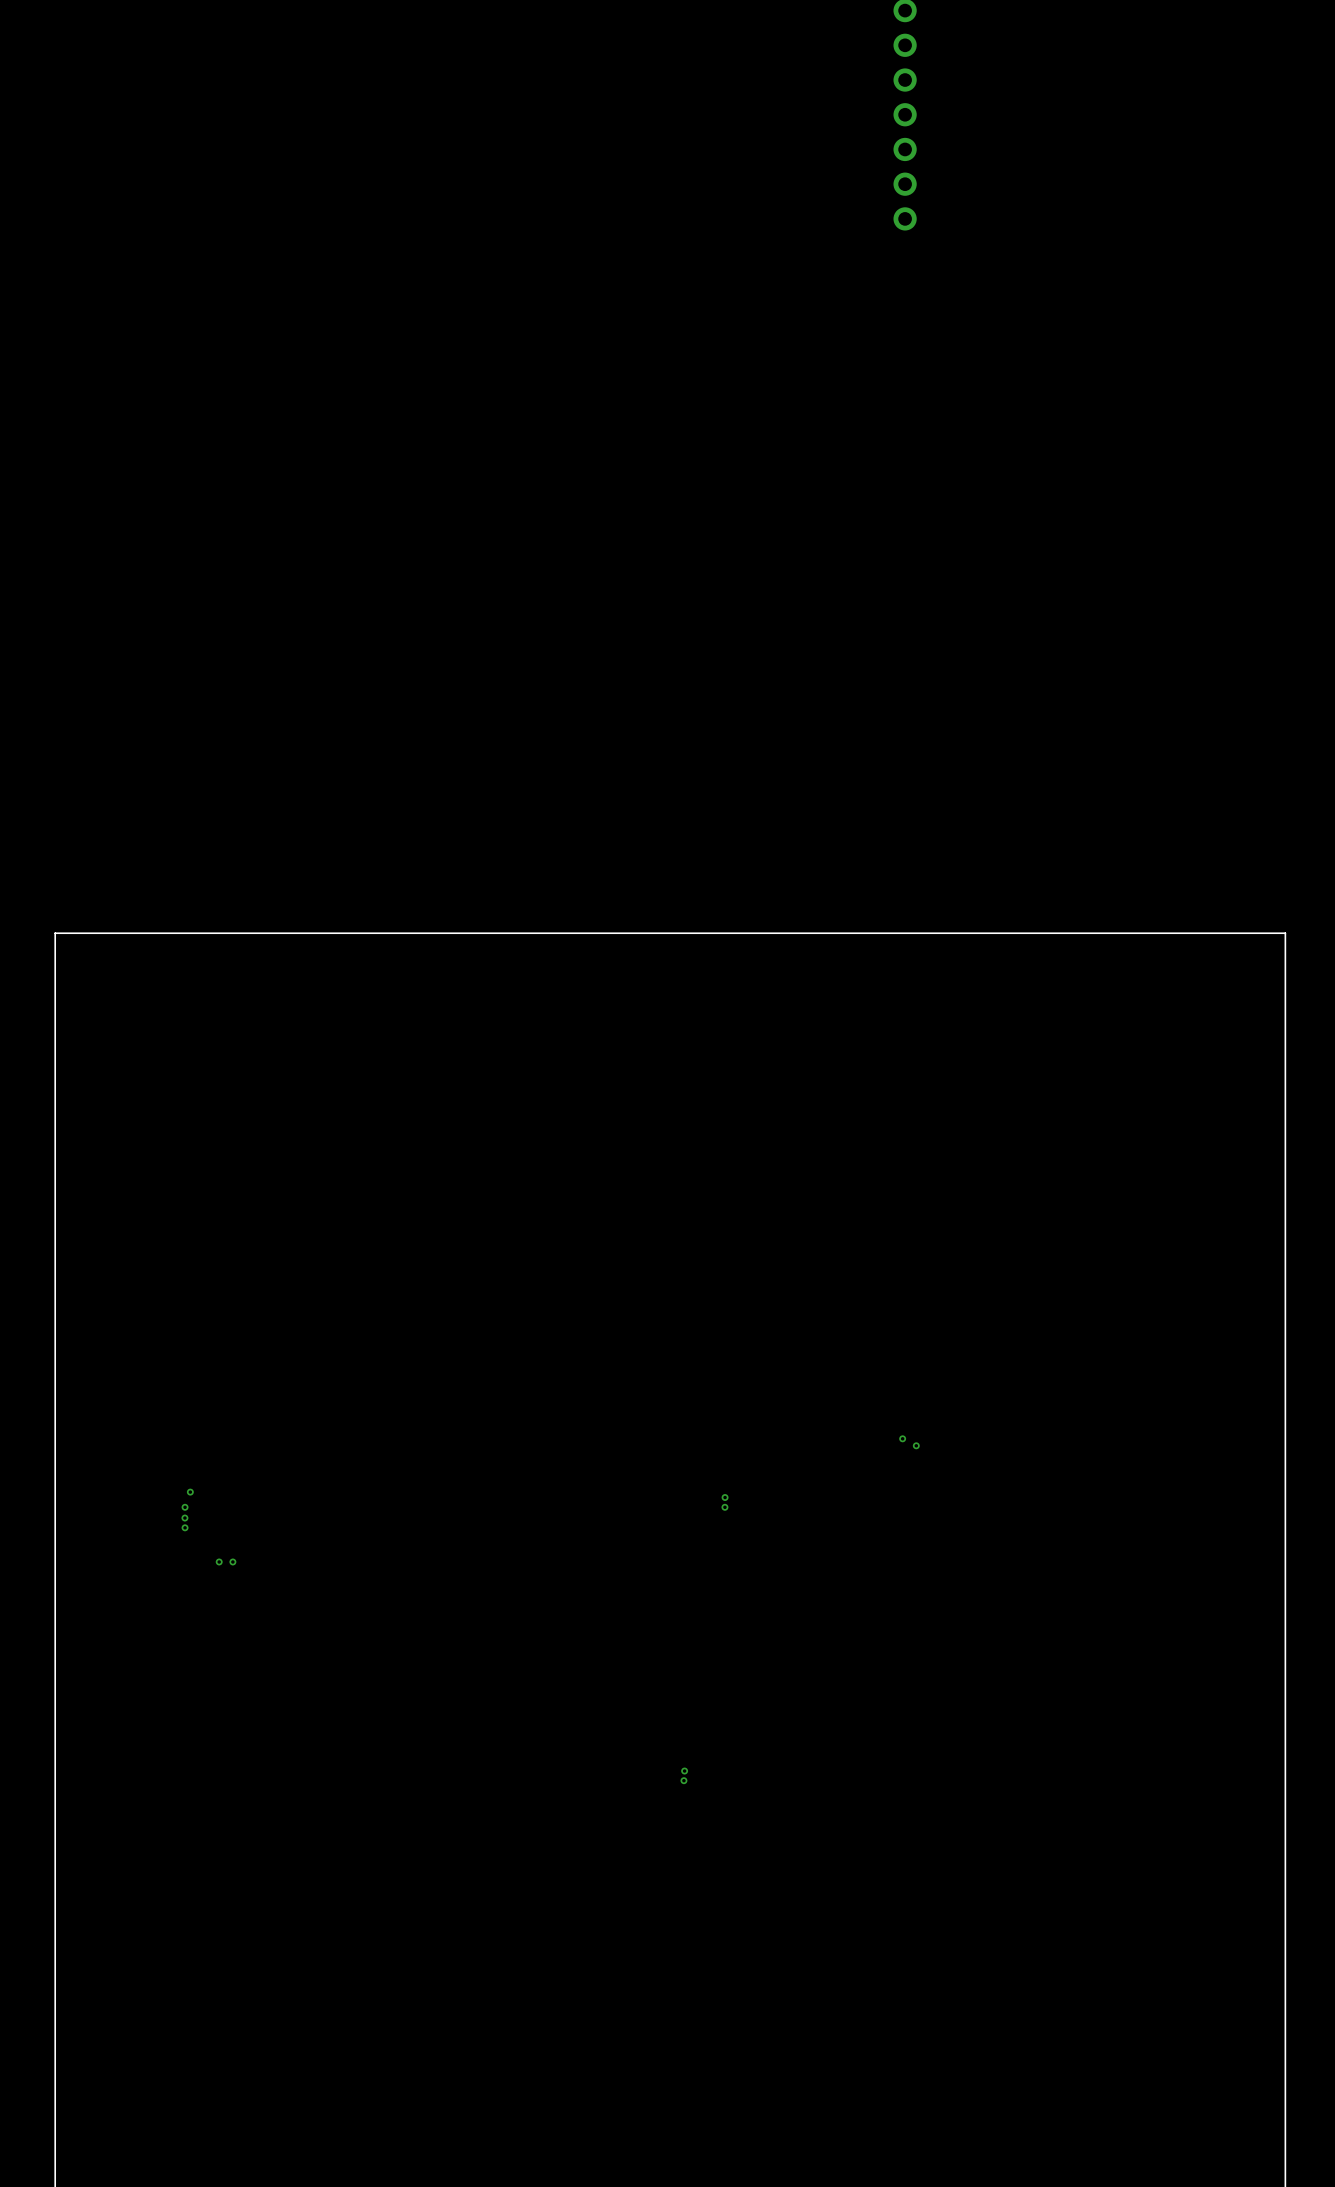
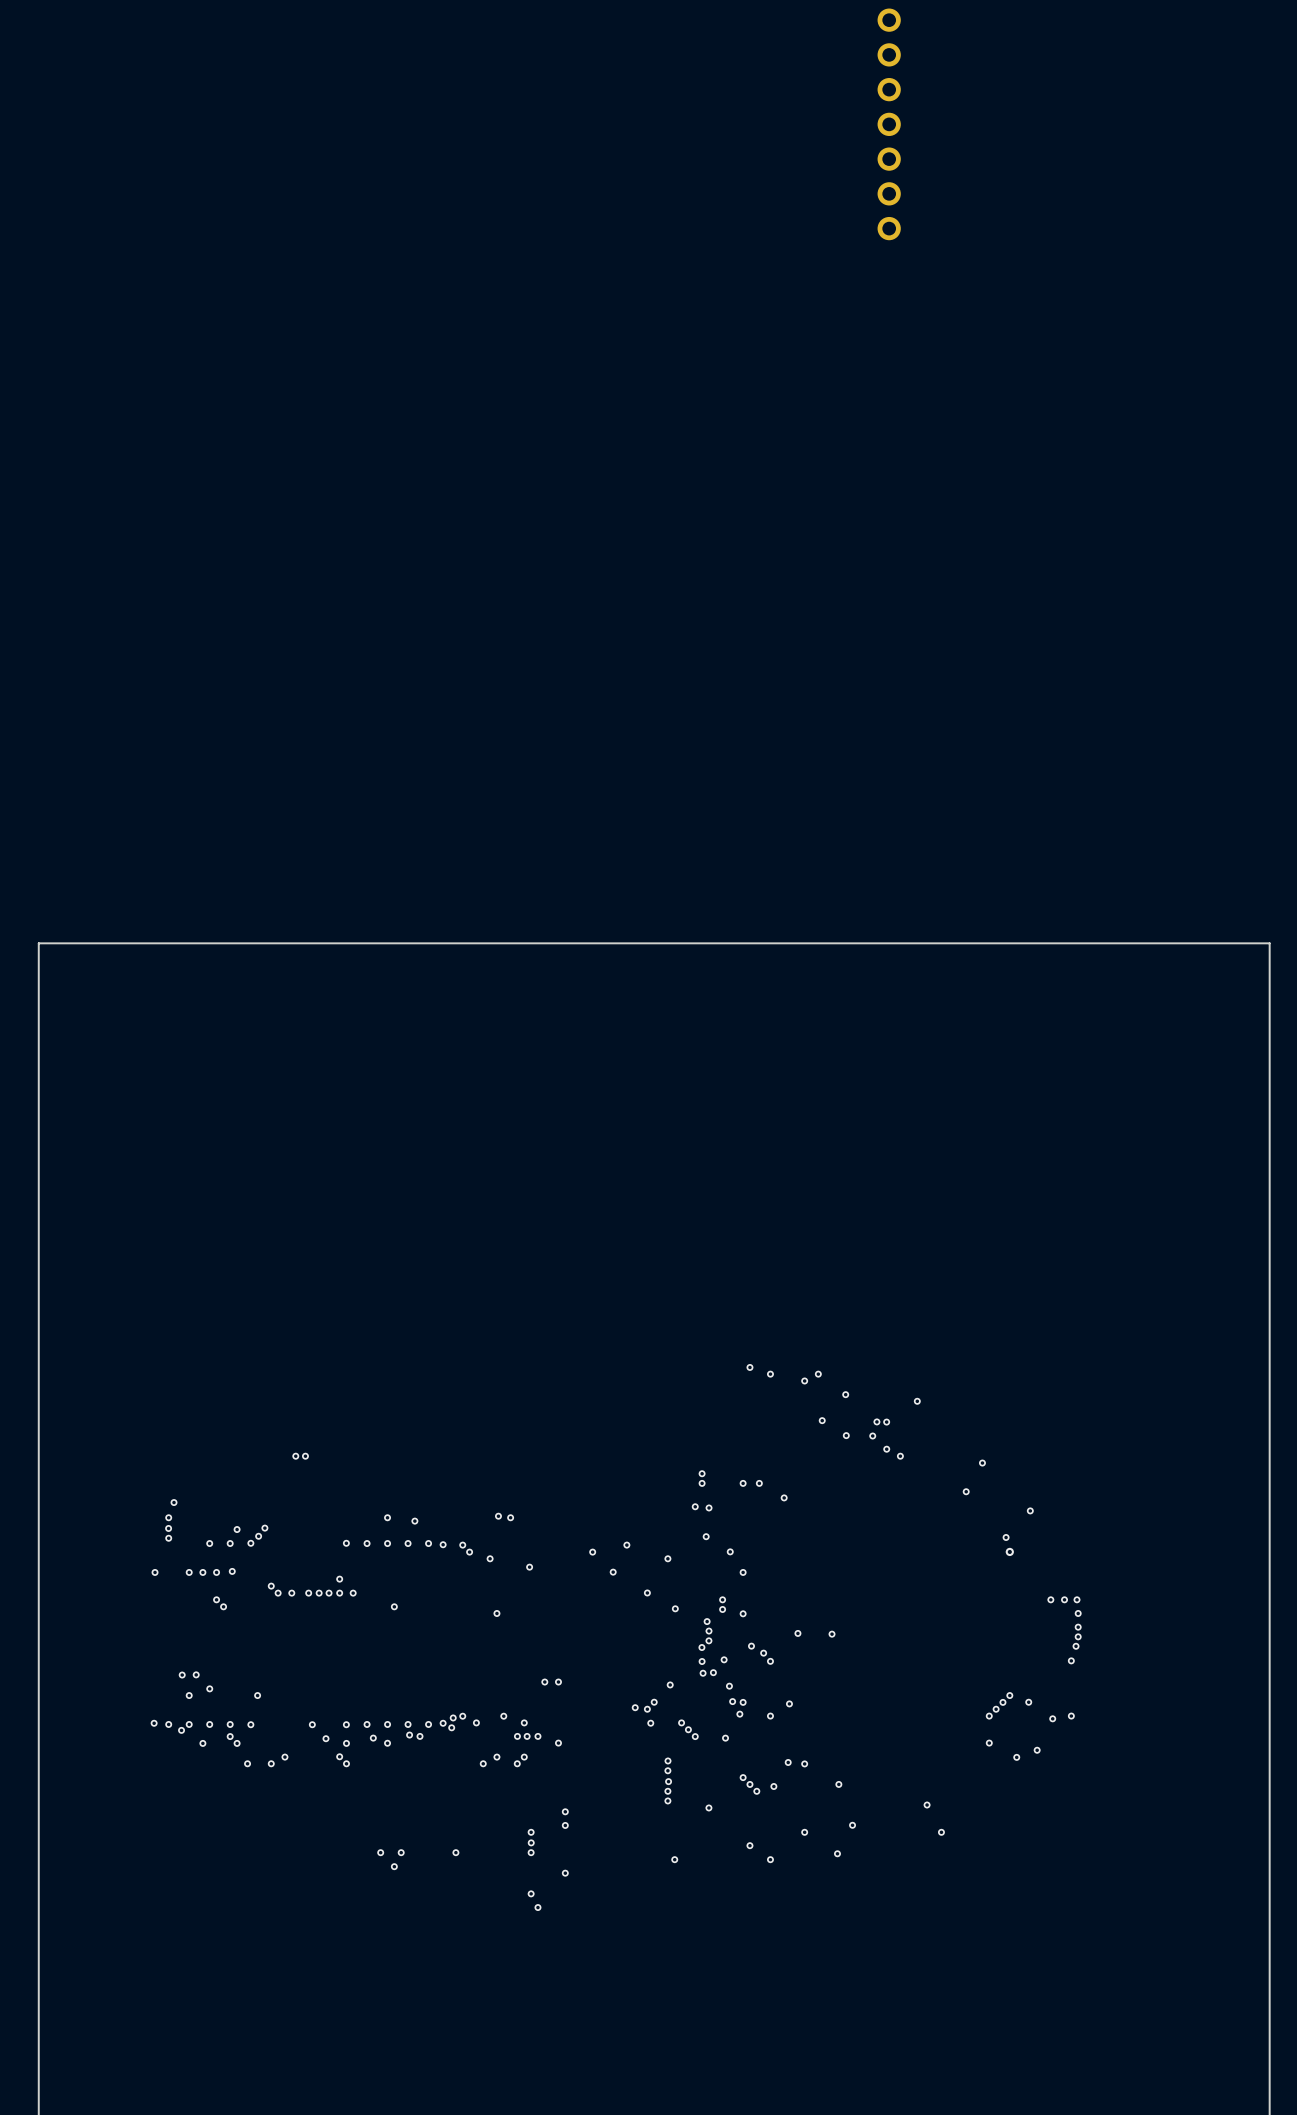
via: none -> (749, 1367)
via: none -> (770, 1374)
via: none -> (818, 1374)
via: none -> (804, 1380)
via: none -> (845, 1394)
via: none -> (917, 1401)
via: none -> (822, 1420)
via: none -> (876, 1421)
via: none -> (886, 1422)
via: none -> (846, 1435)
via: none -> (872, 1436)
via: none -> (295, 1456)
via: none -> (305, 1456)
via: none -> (982, 1463)
via: none -> (702, 1473)
via: none -> (702, 1483)
via: none -> (743, 1483)
via: none -> (759, 1483)
via: none -> (966, 1491)
via: none -> (784, 1497)
via: none -> (695, 1506)
via: none -> (1030, 1510)
via: none -> (498, 1516)
via: none -> (387, 1517)
via: none -> (510, 1517)
via: (724, 1507) -> none
via: none -> (414, 1521)
via: none -> (264, 1528)
via: none -> (237, 1529)
via: none -> (258, 1536)
via: none -> (706, 1536)
via: none -> (1006, 1537)
via: none -> (250, 1543)
via: none -> (346, 1543)
via: none -> (209, 1543)
via: none -> (230, 1543)
via: none -> (367, 1543)
via: none -> (387, 1543)
via: none -> (408, 1543)
via: none -> (428, 1543)
via: none -> (443, 1544)
via: none -> (462, 1545)
via: none -> (626, 1545)
via: none -> (469, 1552)
via: none -> (592, 1552)
via: none -> (730, 1551)
via: none -> (1009, 1551)
via: none -> (490, 1558)
via: none -> (667, 1558)
via: none -> (529, 1567)
via: none -> (232, 1571)
via: none -> (155, 1572)
via: none -> (189, 1572)
via: none -> (613, 1572)
via: none -> (743, 1572)
via: none -> (339, 1579)
via: none -> (271, 1586)
via: none -> (278, 1593)
via: none -> (291, 1593)
via: none -> (308, 1593)
via: none -> (319, 1593)
via: none -> (329, 1593)
via: none -> (339, 1593)
via: none -> (353, 1593)
via: none -> (647, 1592)
via: none -> (216, 1599)
via: none -> (722, 1599)
via: none -> (1050, 1599)
via: none -> (1064, 1599)
via: none -> (1077, 1599)
via: none -> (223, 1606)
via: none -> (394, 1606)
via: none -> (675, 1608)
via: none -> (722, 1609)
via: none -> (496, 1613)
via: none -> (1078, 1613)
via: none -> (743, 1613)
via: none -> (707, 1621)
via: none -> (1078, 1627)
via: none -> (708, 1631)
via: none -> (797, 1633)
via: none -> (832, 1634)
via: none -> (1078, 1636)
via: none -> (708, 1640)
via: none -> (751, 1646)
via: none -> (1076, 1646)
via: none -> (701, 1647)
via: none -> (763, 1653)
via: none -> (724, 1659)
via: none -> (702, 1661)
via: none -> (770, 1661)
via: none -> (1071, 1660)
via: none -> (703, 1673)
via: none -> (713, 1672)
via: none -> (182, 1675)
via: none -> (196, 1674)
via: none -> (544, 1682)
via: none -> (558, 1682)
via: none -> (670, 1684)
via: none -> (729, 1686)
via: none -> (209, 1688)
via: none -> (189, 1695)
via: none -> (257, 1695)
via: none -> (1009, 1695)
via: none -> (654, 1702)
via: none -> (732, 1701)
via: none -> (743, 1702)
via: none -> (1002, 1702)
via: none -> (1028, 1702)
via: none -> (789, 1703)
via: none -> (635, 1707)
via: none -> (647, 1709)
via: none -> (996, 1709)
via: none -> (739, 1714)
via: none -> (462, 1716)
via: none -> (503, 1716)
via: none -> (770, 1716)
via: none -> (989, 1716)
via: none -> (1071, 1716)
via: none -> (453, 1717)
via: none -> (1052, 1718)
via: none -> (154, 1723)
via: none -> (443, 1723)
via: none -> (476, 1722)
via: none -> (524, 1722)
via: none -> (650, 1723)
via: none -> (681, 1722)
via: none -> (168, 1724)
via: none -> (189, 1724)
via: none -> (209, 1724)
via: none -> (230, 1724)
via: none -> (367, 1724)
via: none -> (387, 1724)
via: none -> (408, 1724)
via: none -> (428, 1724)
via: none -> (250, 1724)
via: none -> (312, 1724)
via: none -> (346, 1724)
via: none -> (451, 1727)
via: none -> (181, 1730)
via: none -> (688, 1729)
via: none -> (409, 1735)
via: none -> (230, 1736)
via: none -> (419, 1736)
via: none -> (517, 1736)
via: none -> (527, 1736)
via: none -> (537, 1736)
via: none -> (695, 1736)
via: none -> (373, 1738)
via: none -> (725, 1738)
via: none -> (325, 1738)
via: none -> (202, 1743)
via: none -> (237, 1743)
via: none -> (346, 1743)
via: none -> (387, 1743)
via: none -> (558, 1743)
via: none -> (989, 1743)
via: none -> (1037, 1750)
via: none -> (284, 1757)
via: none -> (339, 1756)
via: none -> (496, 1757)
via: none -> (524, 1757)
via: none -> (1016, 1757)
via: none -> (668, 1760)
via: none -> (788, 1762)
via: none -> (247, 1763)
via: none -> (271, 1763)
via: none -> (346, 1763)
via: none -> (483, 1763)
via: none -> (517, 1763)
via: none -> (804, 1763)
via: none -> (667, 1770)
via: none -> (743, 1777)
via: none -> (749, 1784)
via: none -> (838, 1784)
via: none -> (773, 1786)
via: none -> (756, 1791)
via: none -> (667, 1800)
via: none -> (927, 1805)
via: none -> (708, 1807)
via: none -> (565, 1811)
via: none -> (565, 1825)
via: none -> (852, 1825)
via: none -> (531, 1832)
via: none -> (804, 1832)
via: none -> (941, 1832)
via: none -> (531, 1842)
via: none -> (749, 1845)
via: none -> (380, 1852)
via: none -> (401, 1852)
via: none -> (455, 1852)
via: none -> (531, 1852)
via: none -> (837, 1853)
via: none -> (674, 1859)
via: none -> (770, 1859)
via: none -> (394, 1866)
via: none -> (565, 1873)
via: none -> (531, 1893)
via: none -> (537, 1907)

